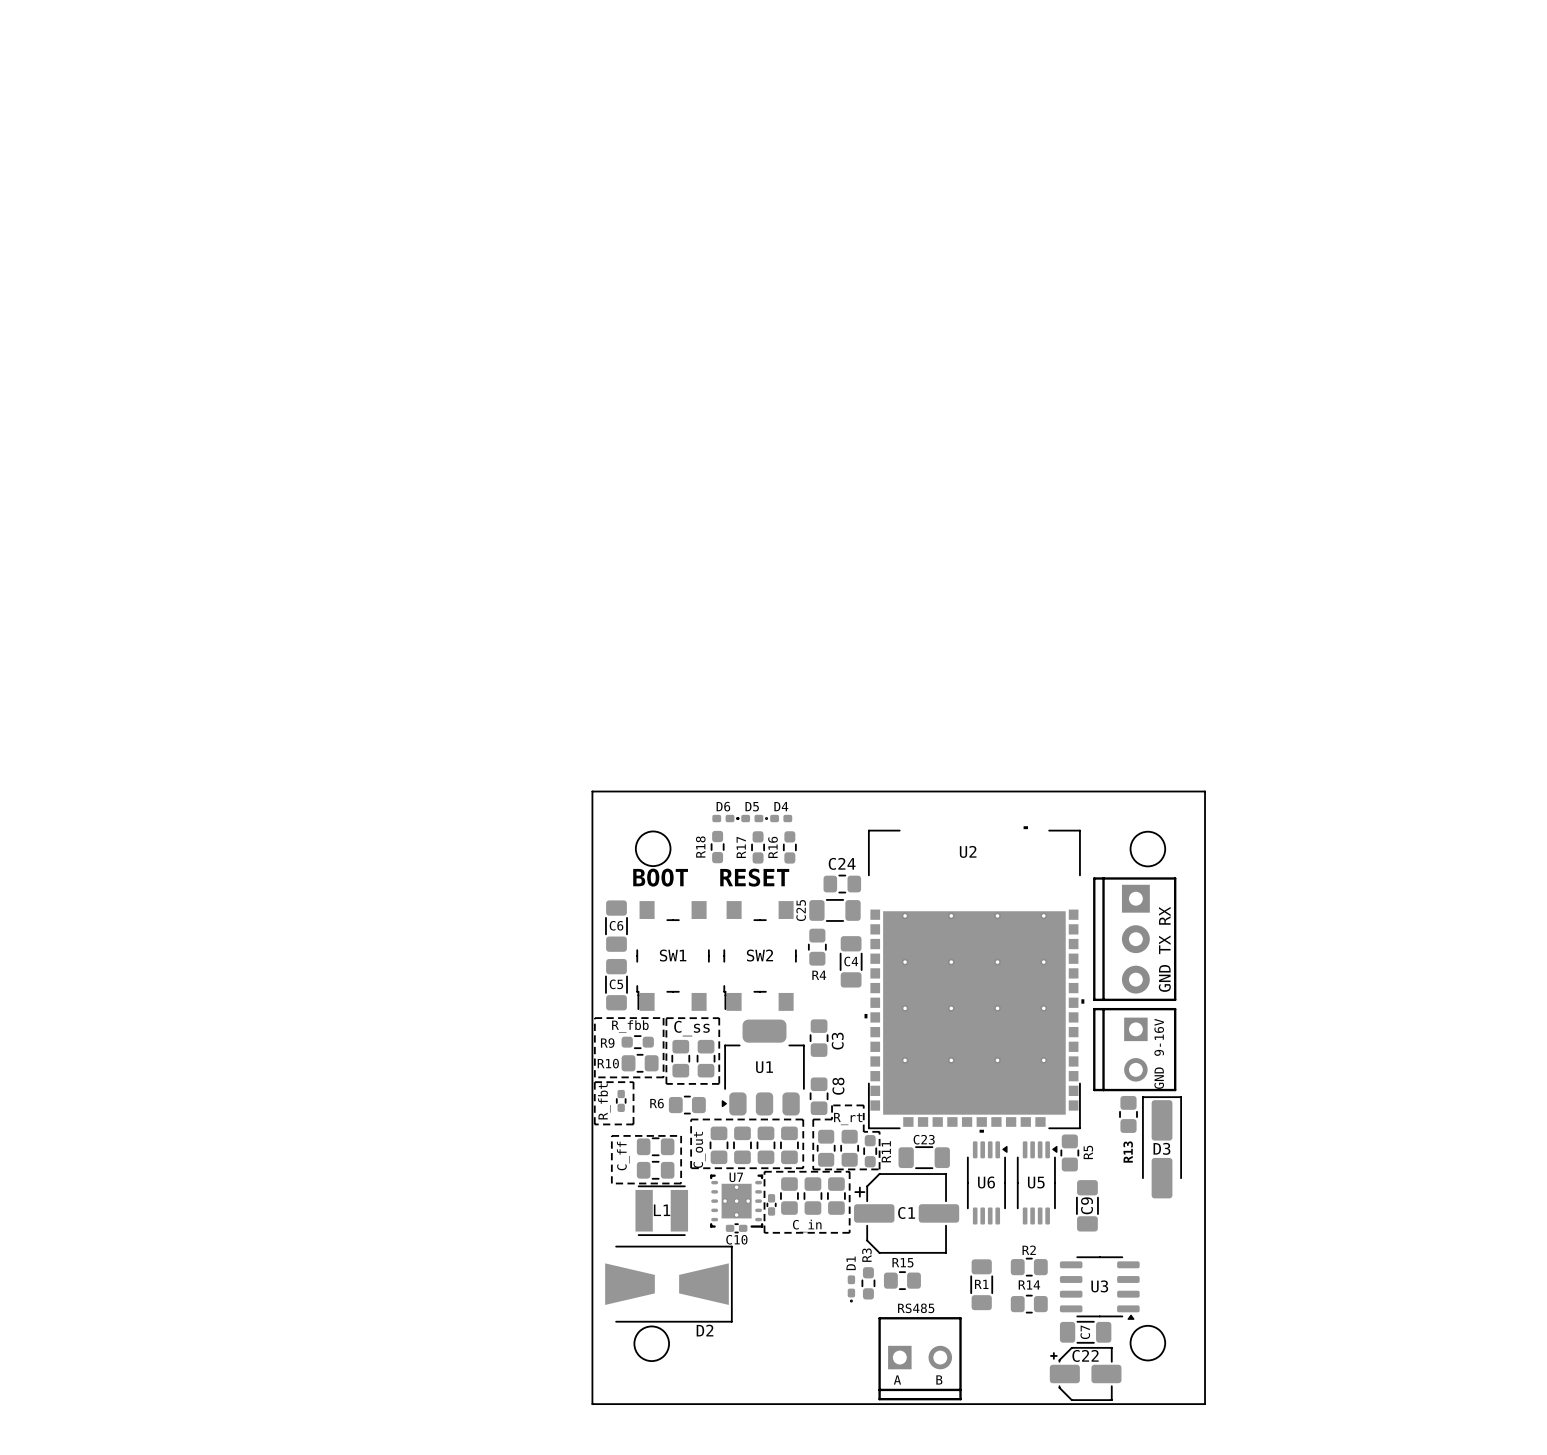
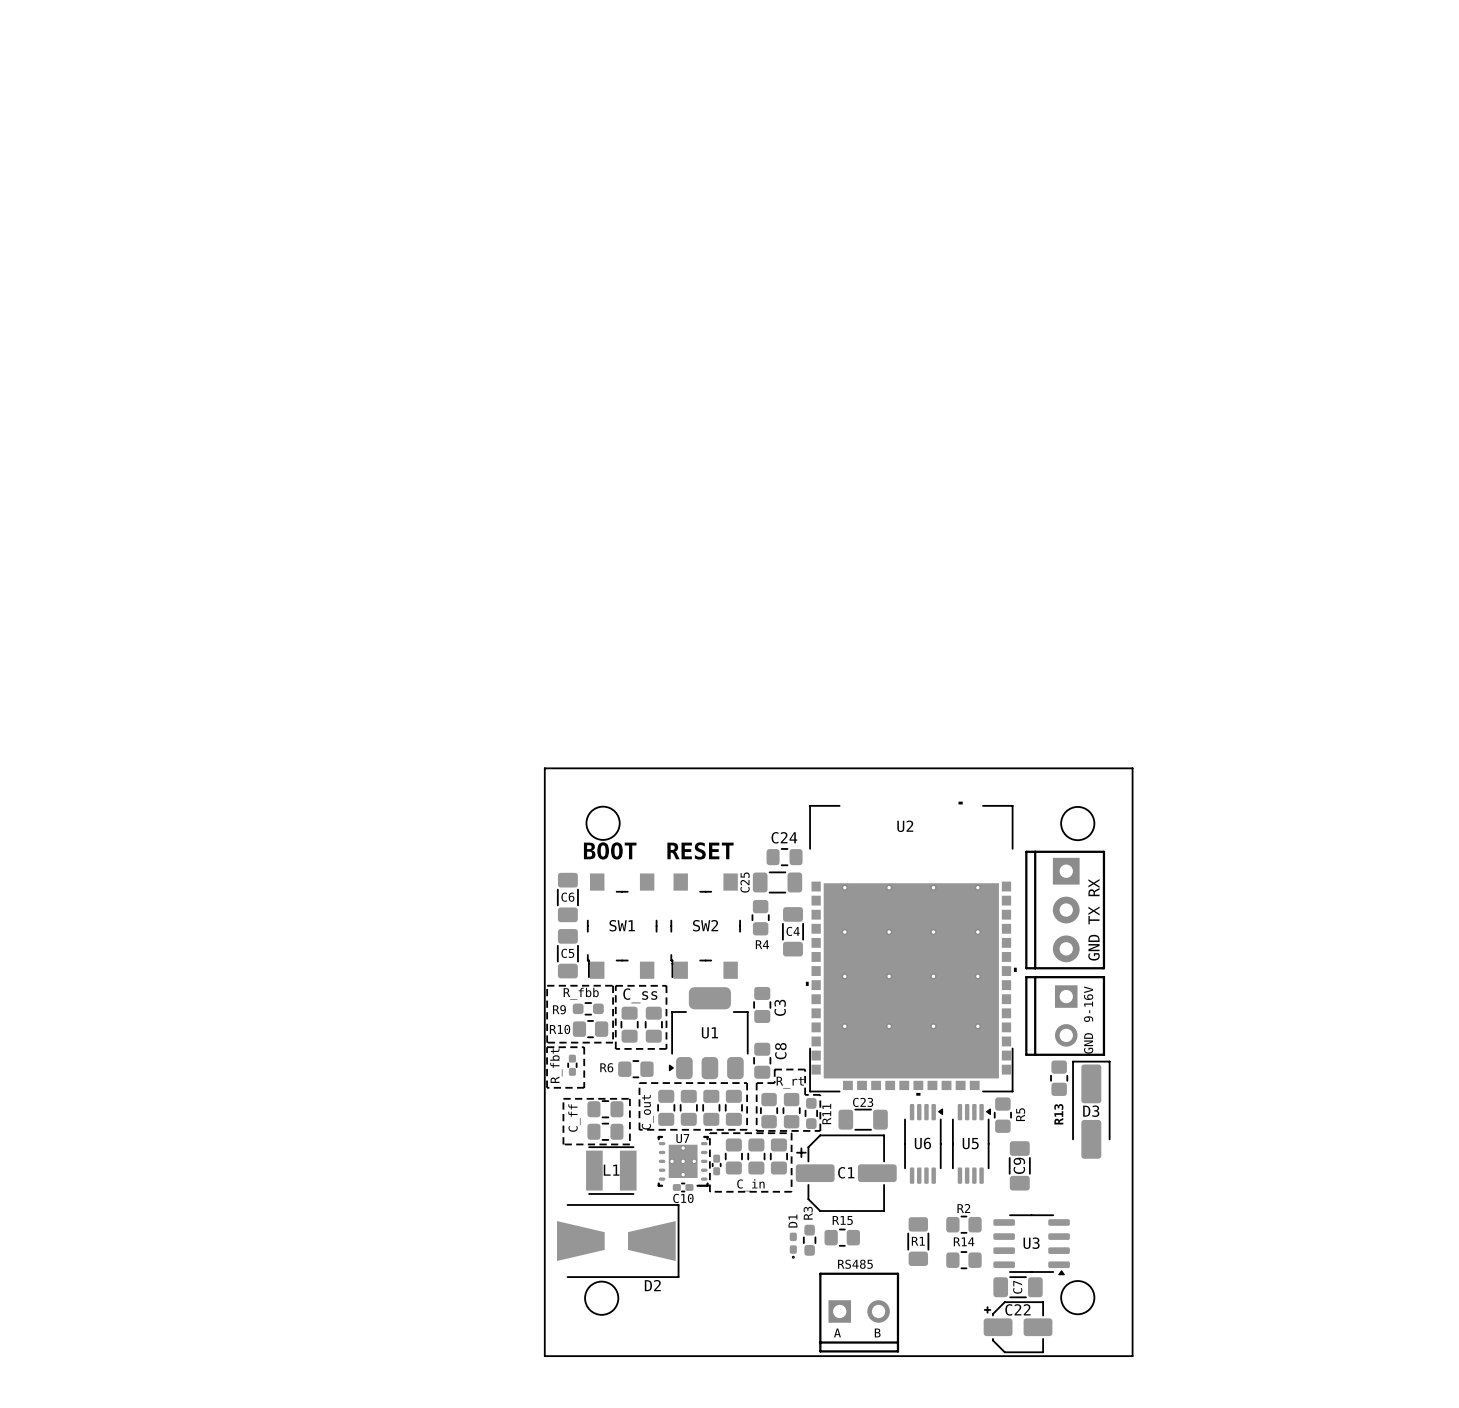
D6: (725, 818) -> none
D5: (749, 818) -> none
D4: (778, 818) -> none
R18: (717, 847) -> none
R17: (758, 847) -> none
R16: (789, 847) -> none

